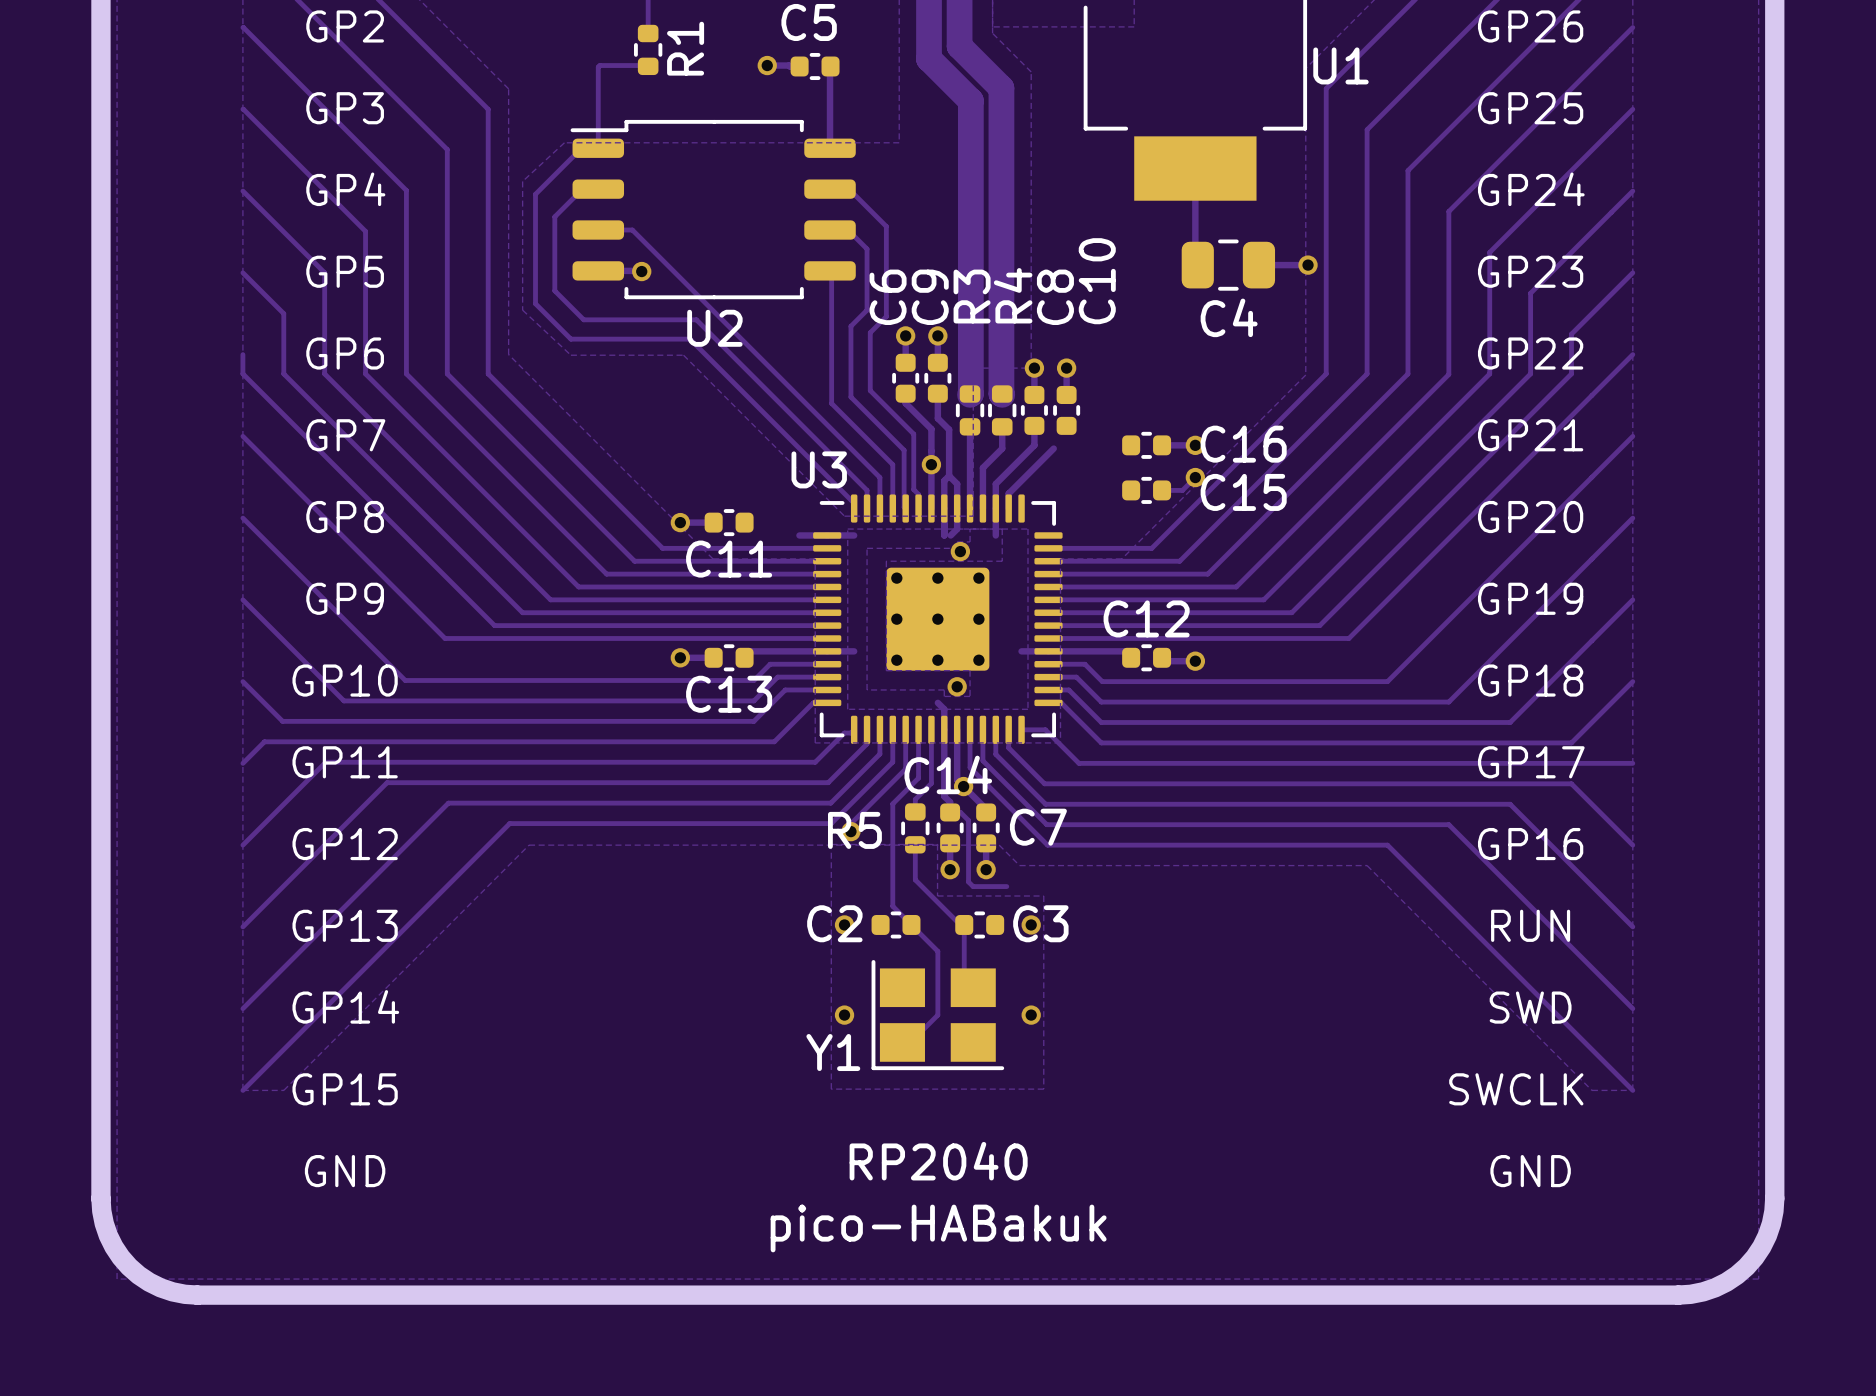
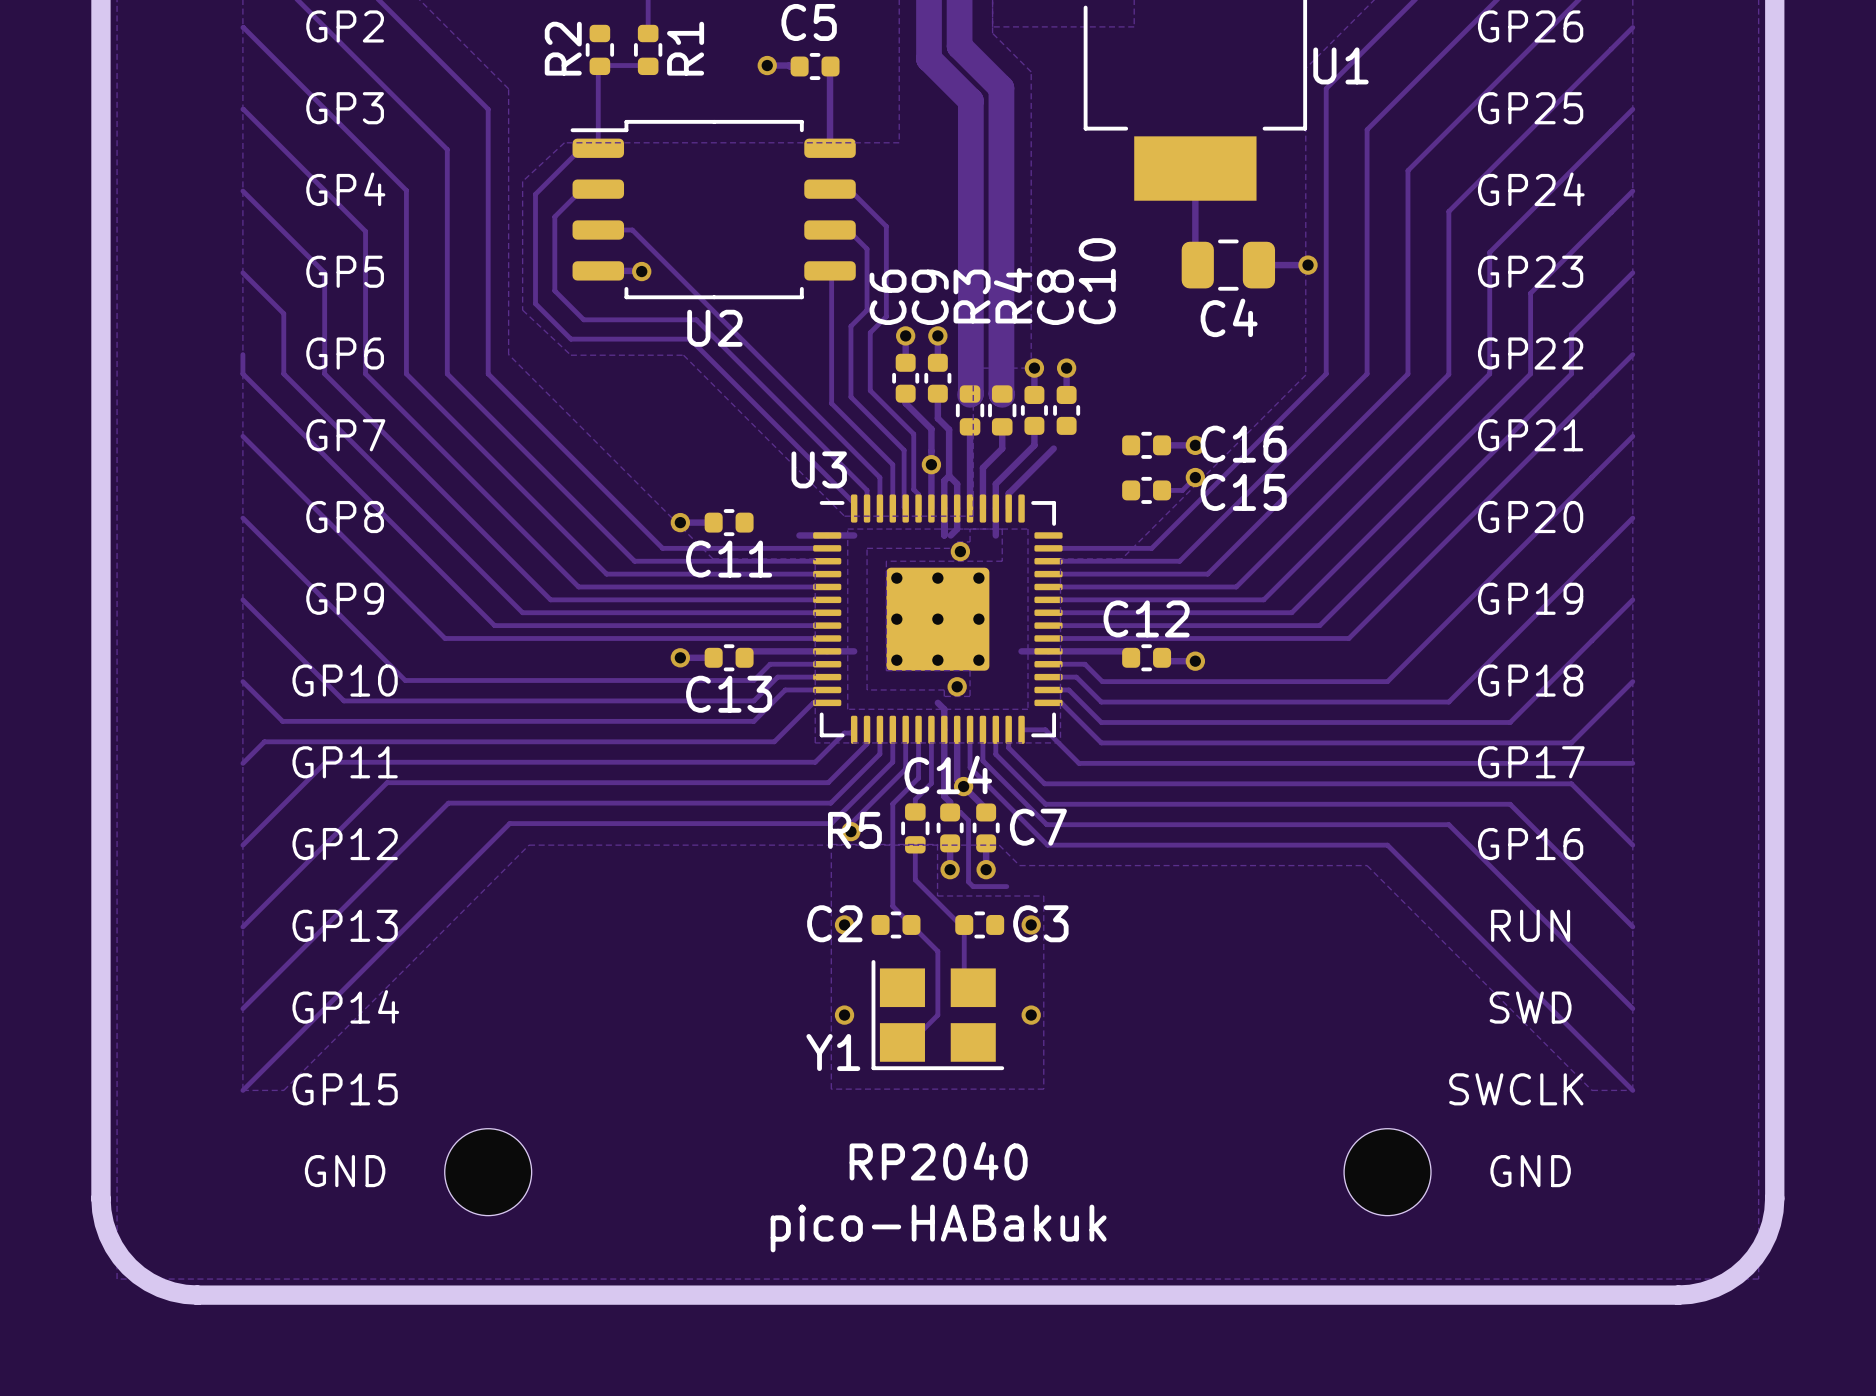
R2: none -> (599, 49)
part: none -> (488, 1172)
part: none -> (1387, 1172)

